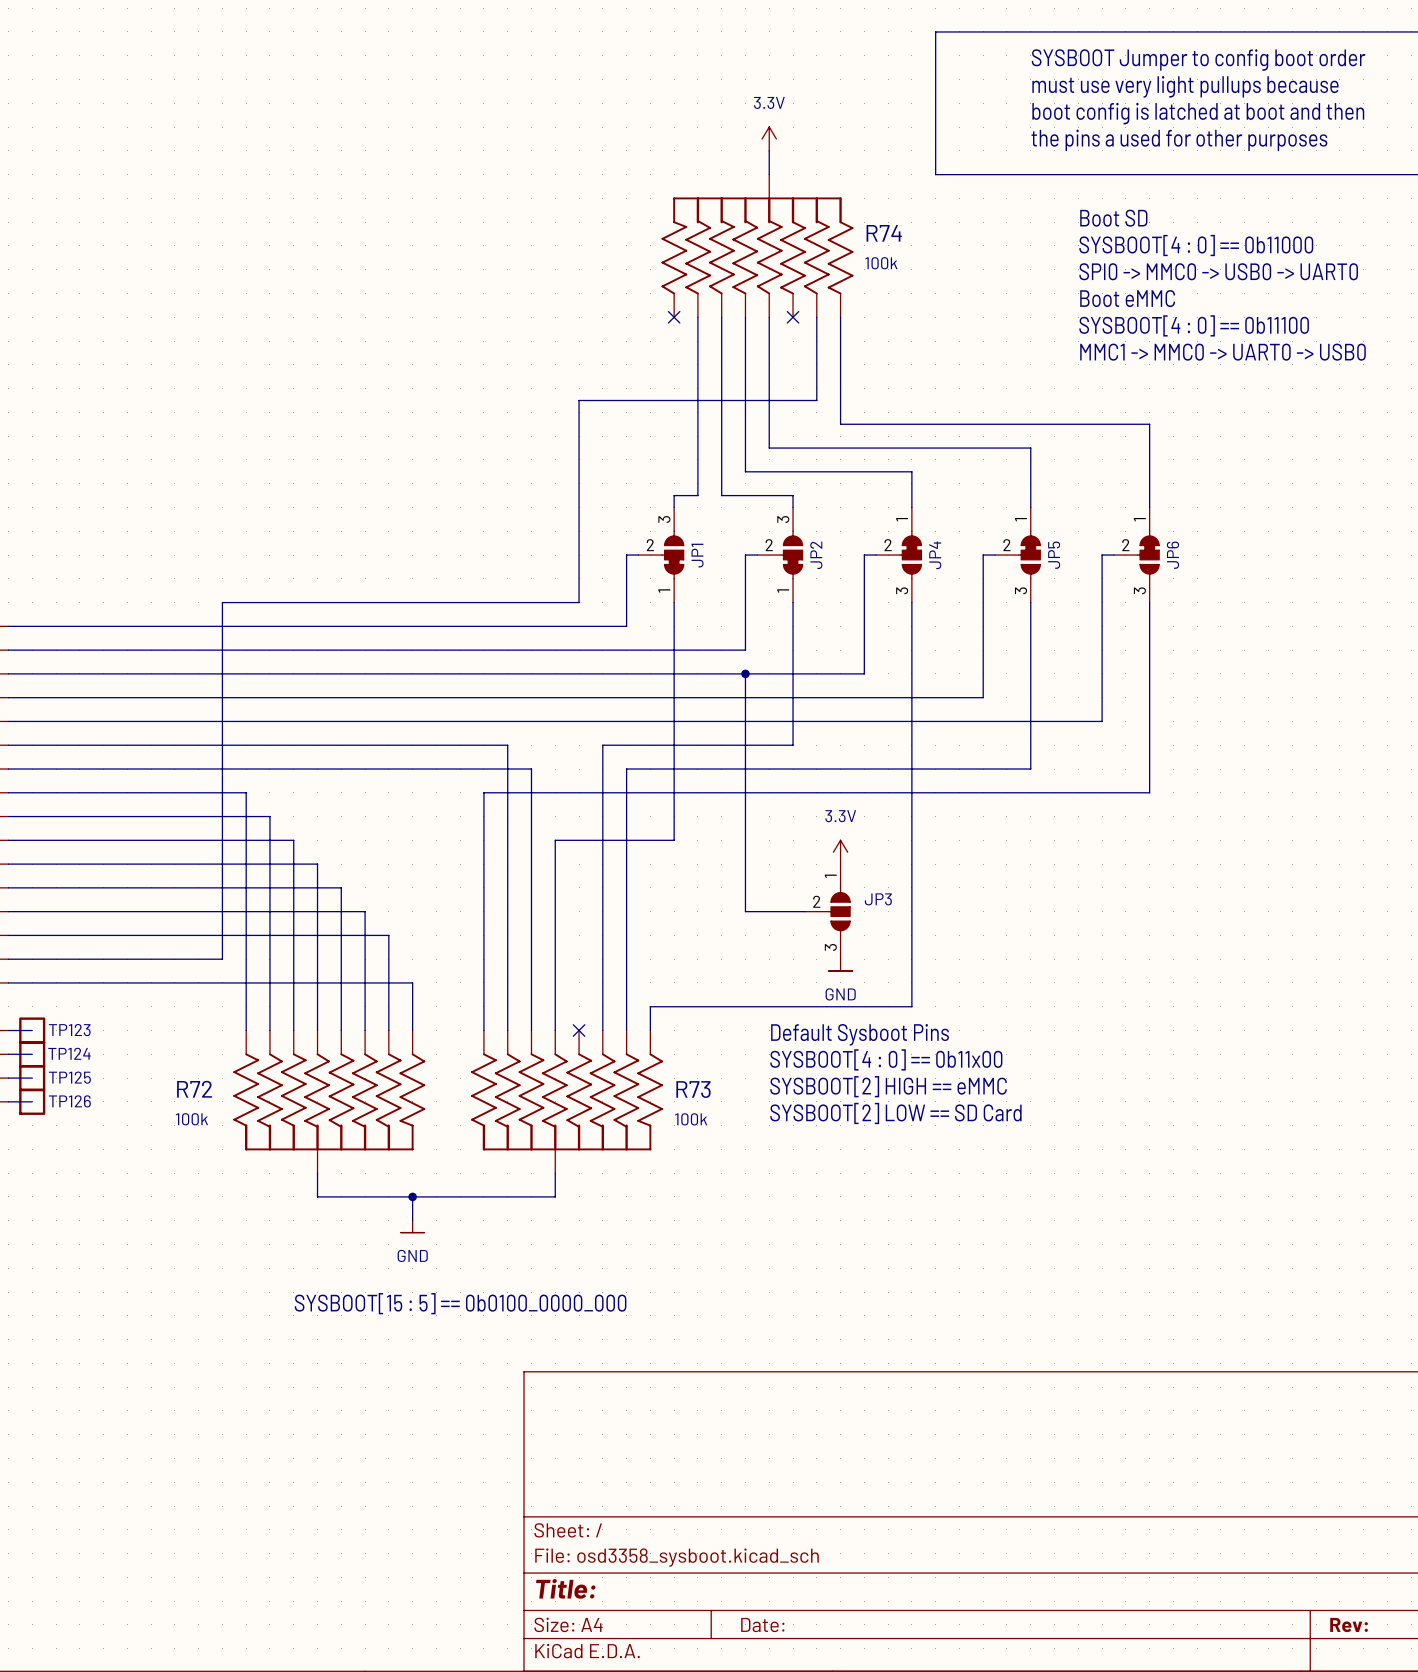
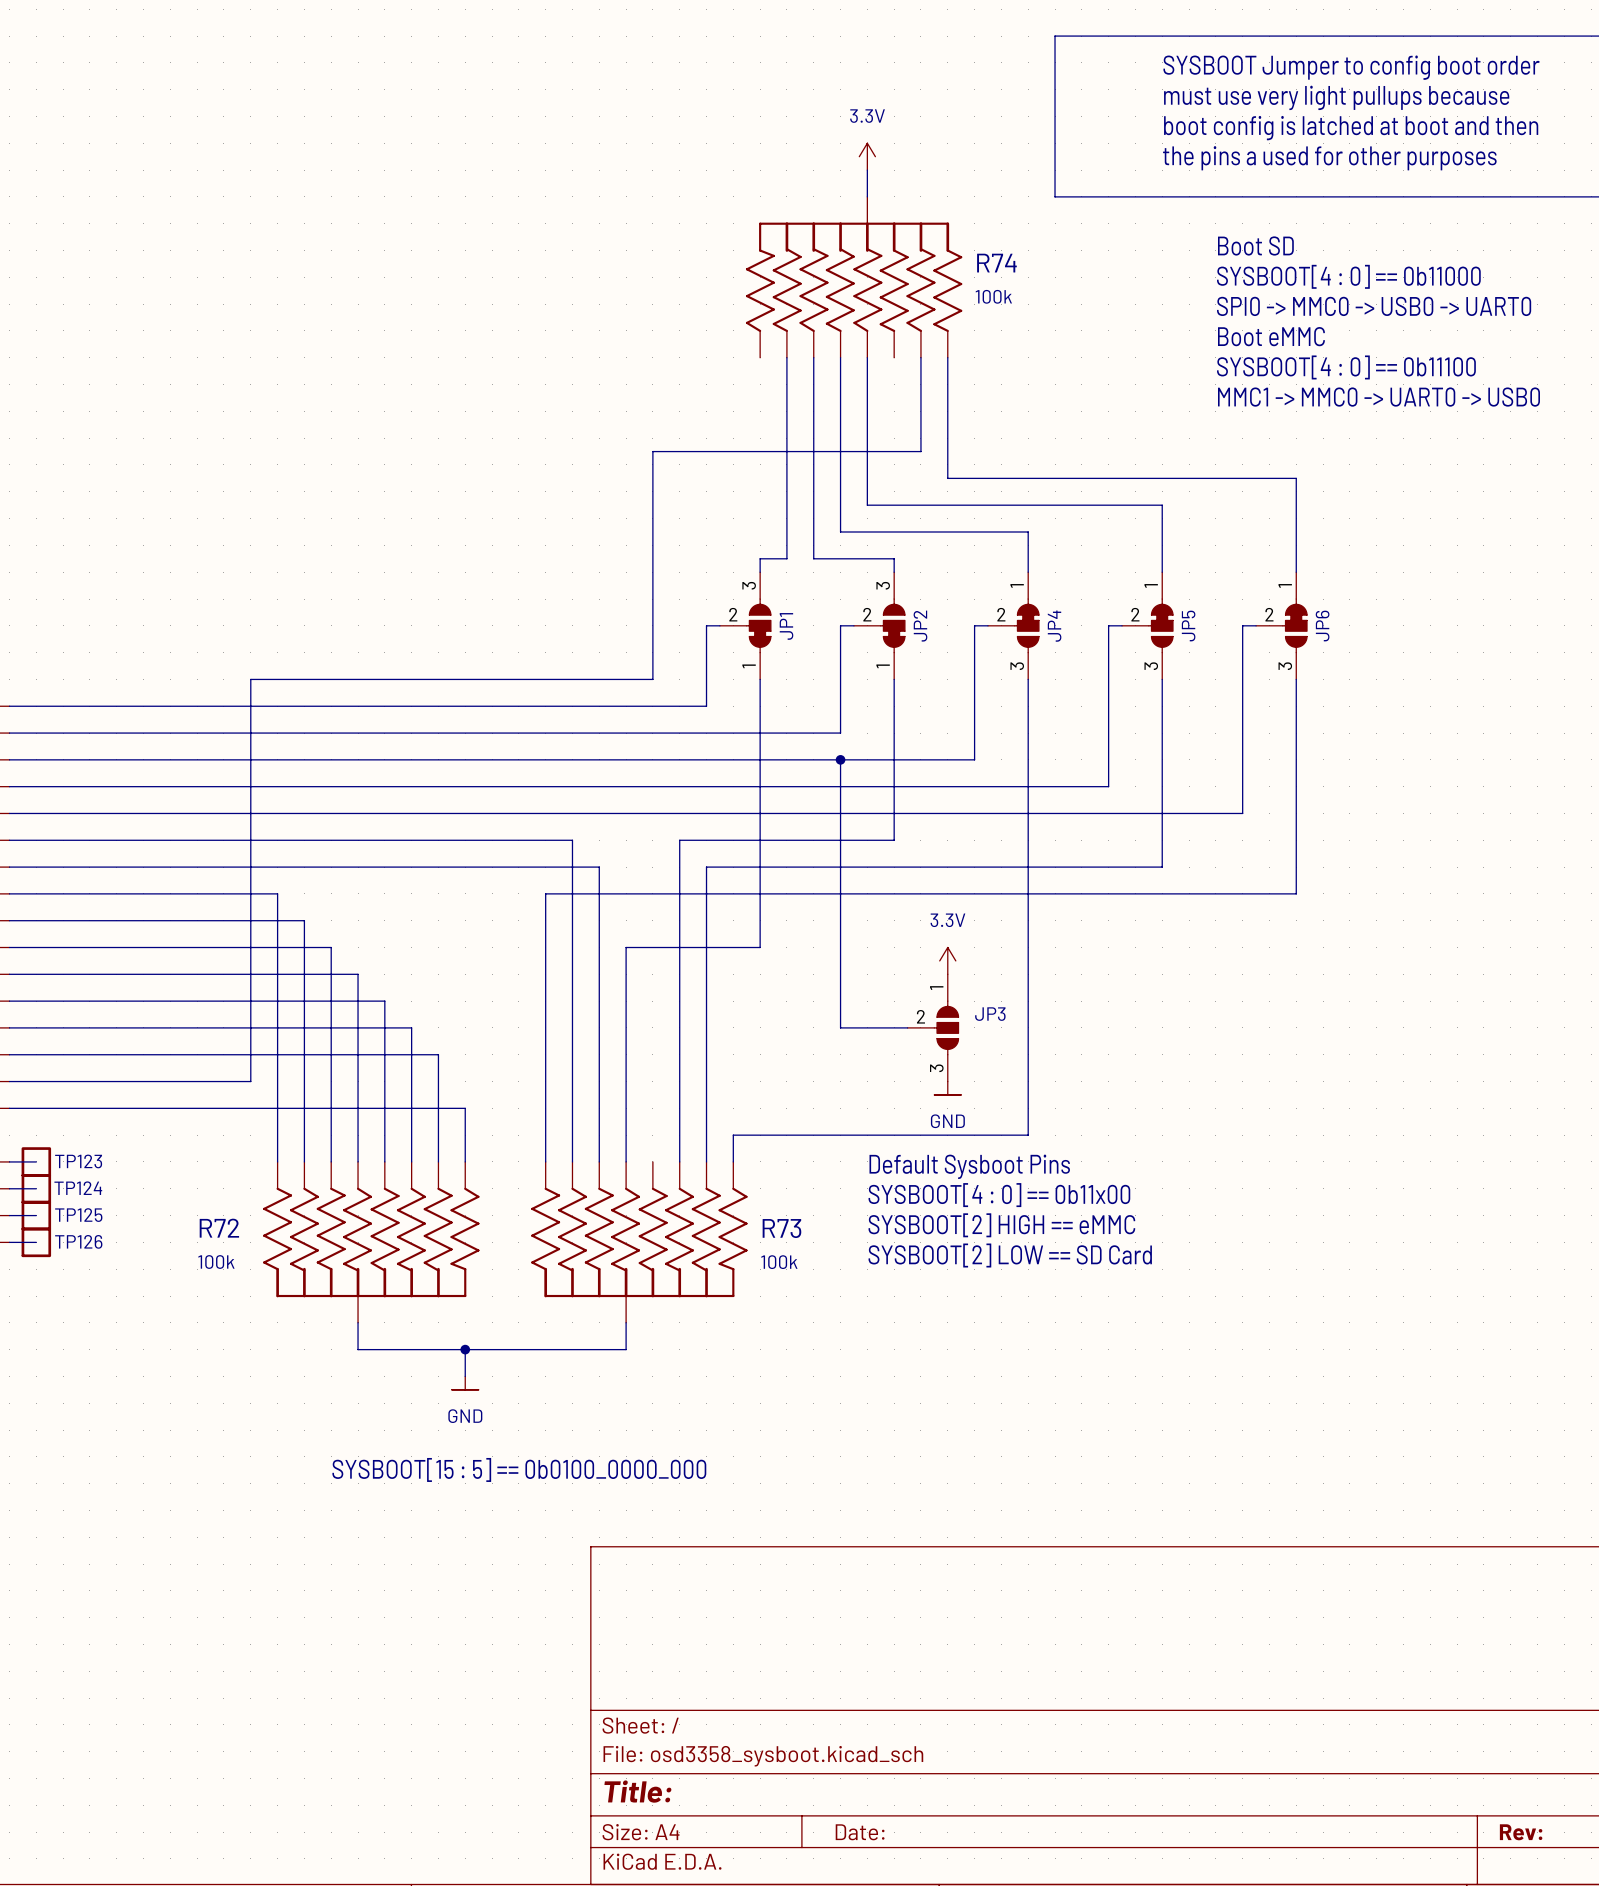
no-connect mark: (674, 317) -> none
no-connect mark: (793, 317) -> none
no-connect mark: (579, 1030) -> none

